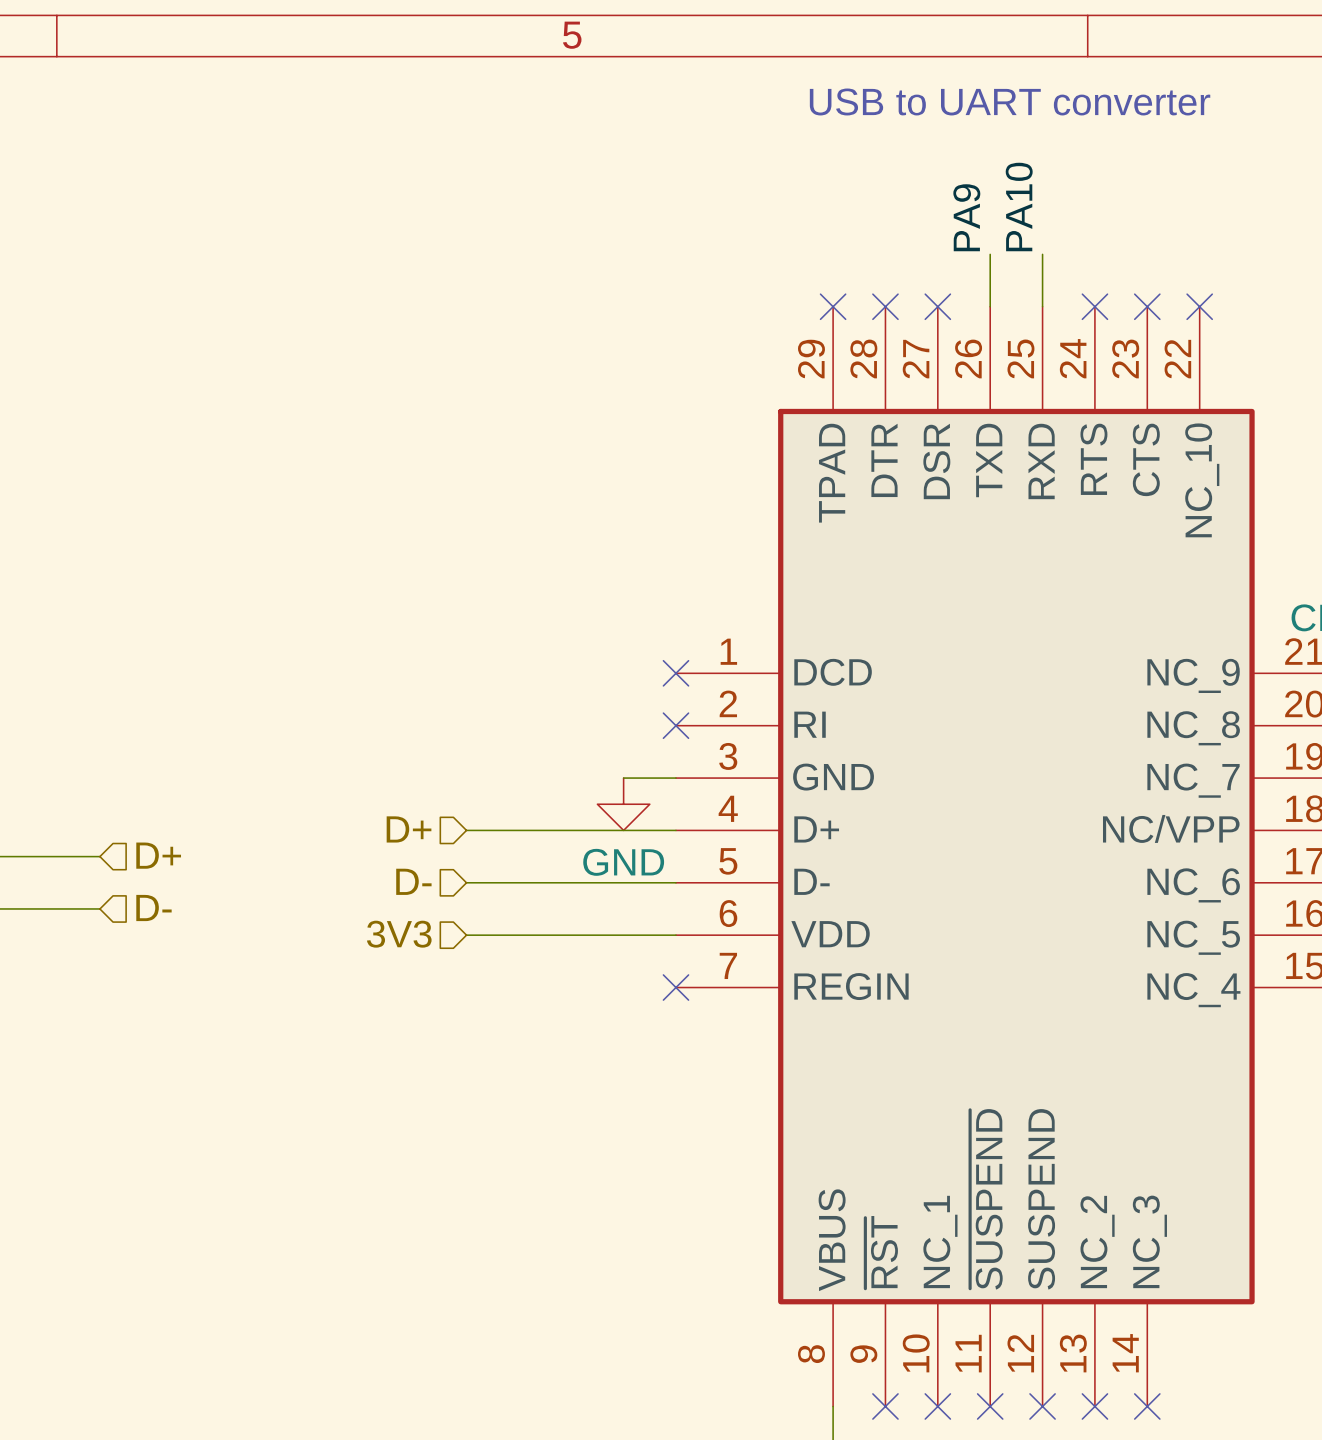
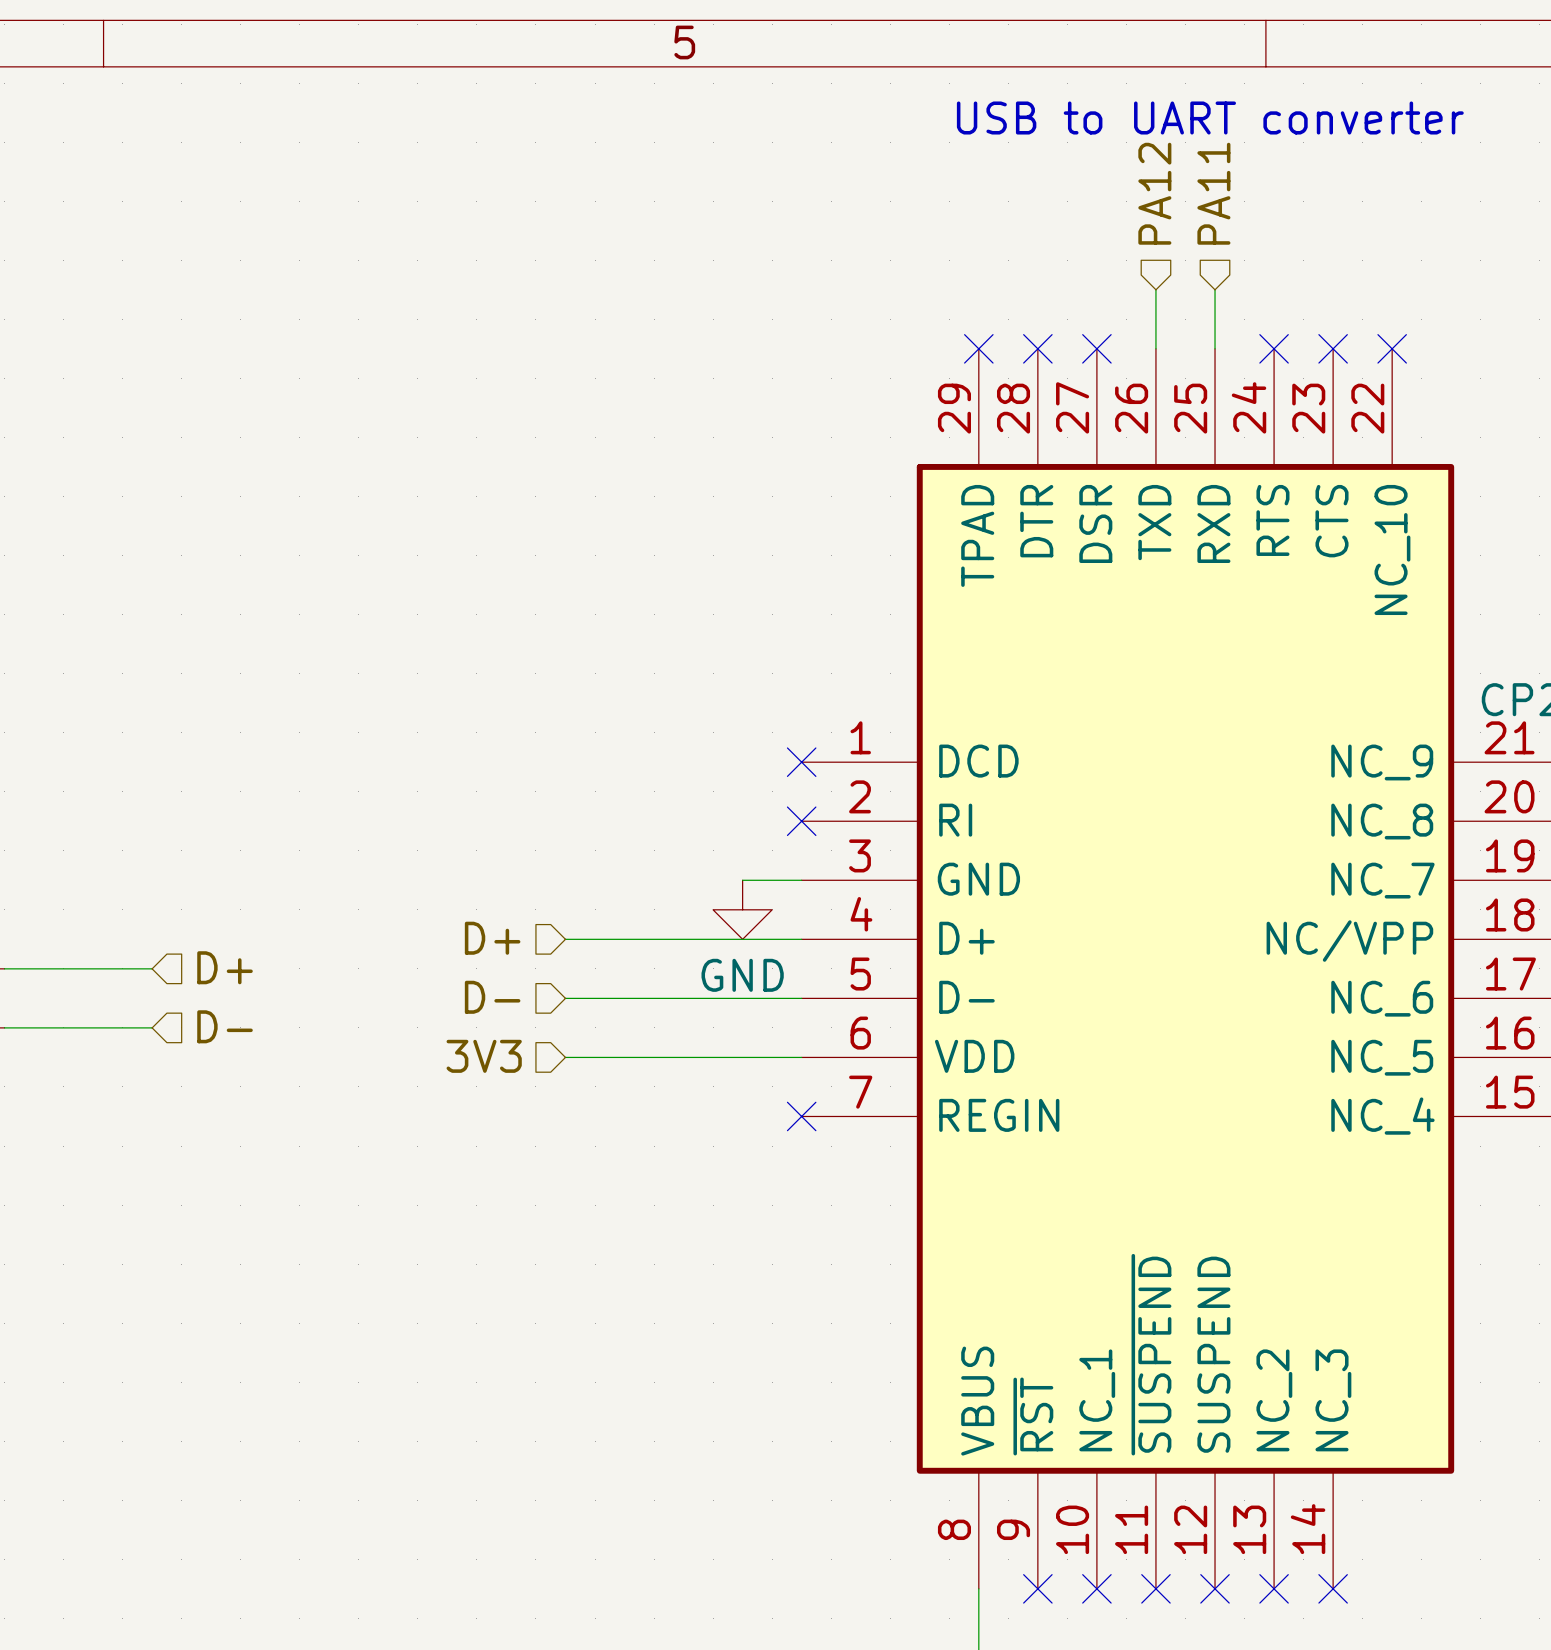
hierarchical label: none -> PA12 (1154, 193)
hierarchical label: none -> PA11 (1213, 193)
label: PA10 (1019, 207) -> none
label: PA9 (966, 217) -> none

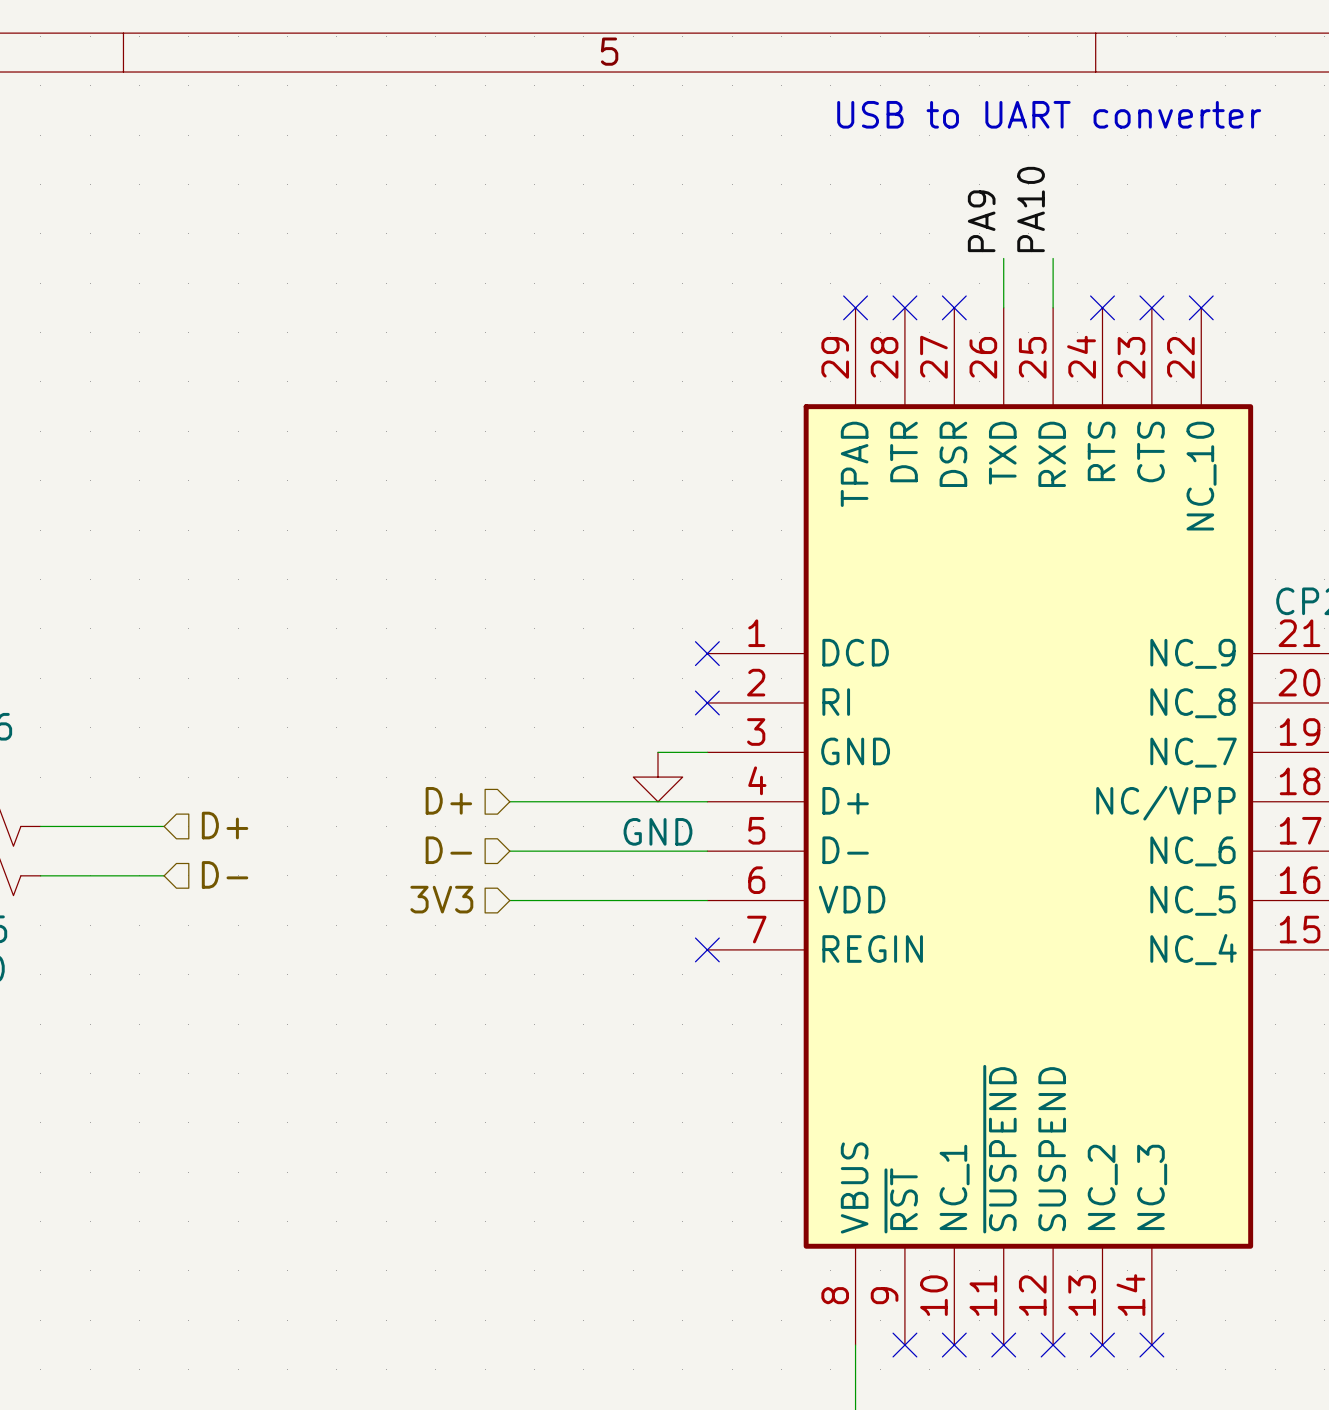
hierarchical label: PA12 (1154, 193) -> none
hierarchical label: PA11 (1213, 193) -> none
label: none -> PA10 (1031, 209)
label: none -> PA9 (981, 221)

